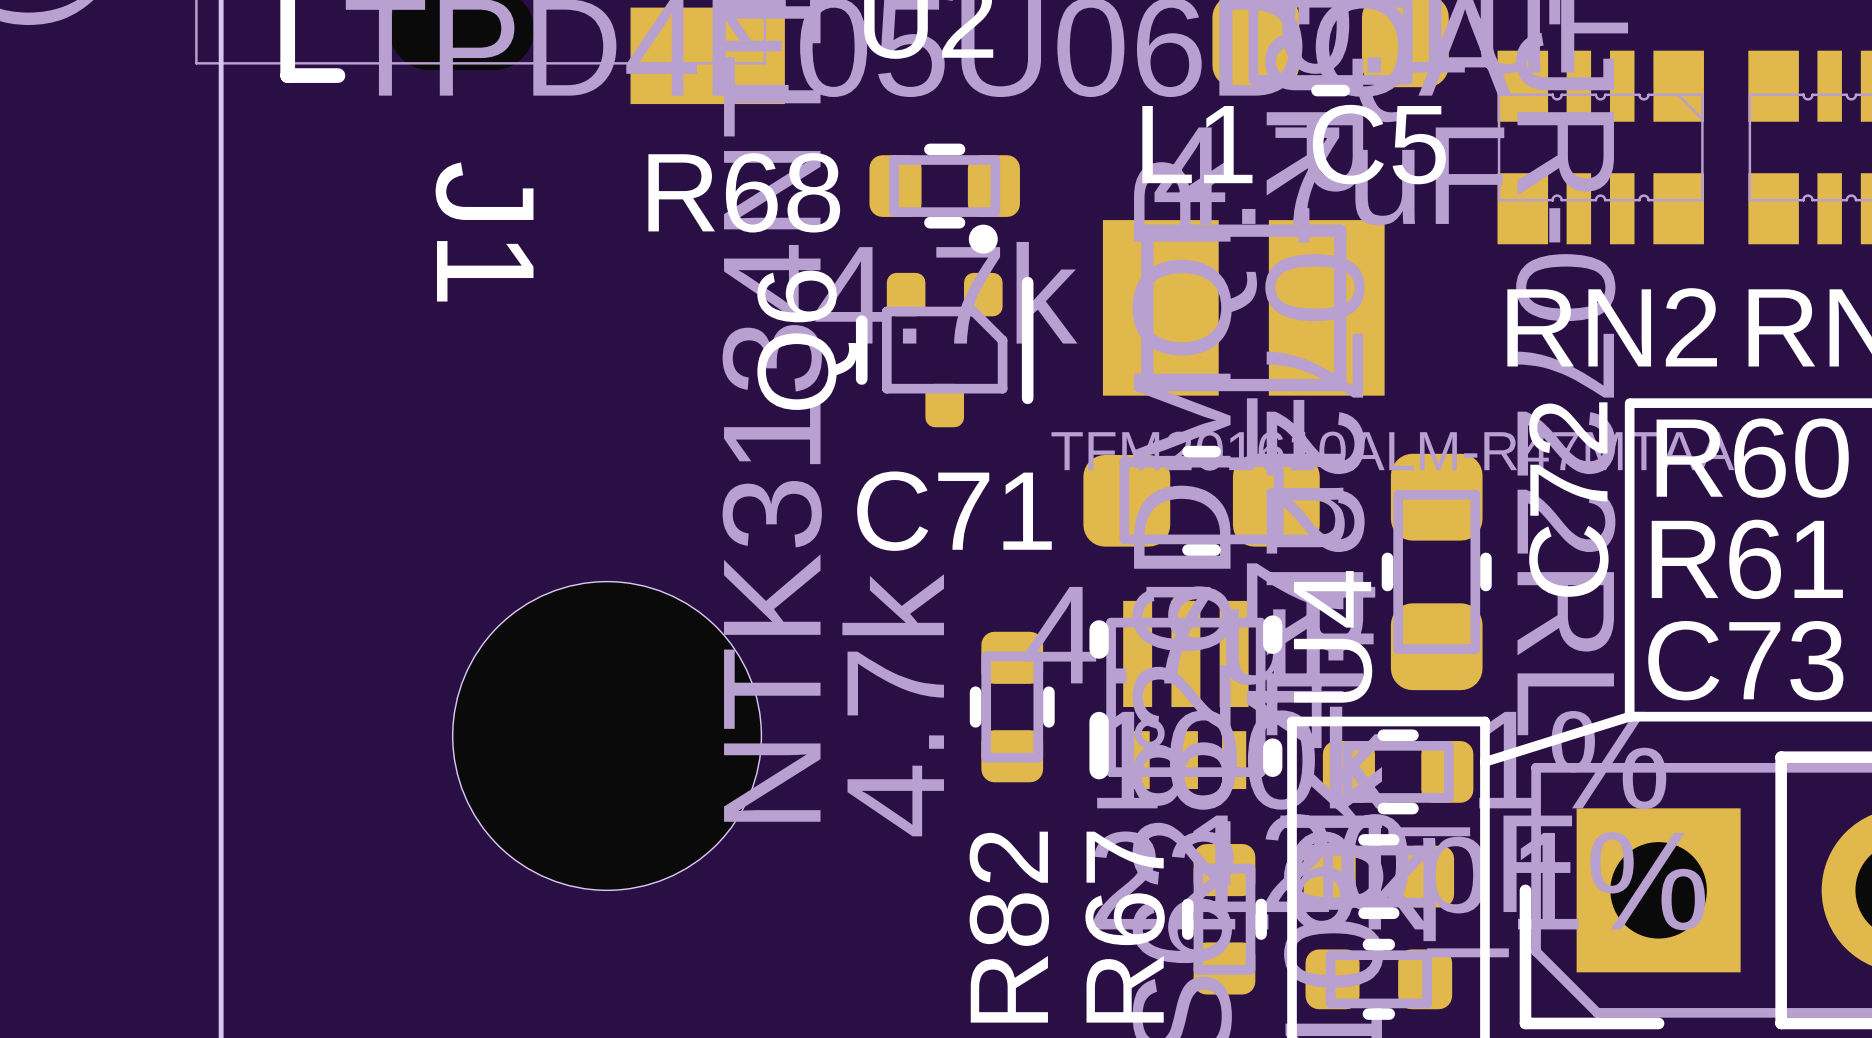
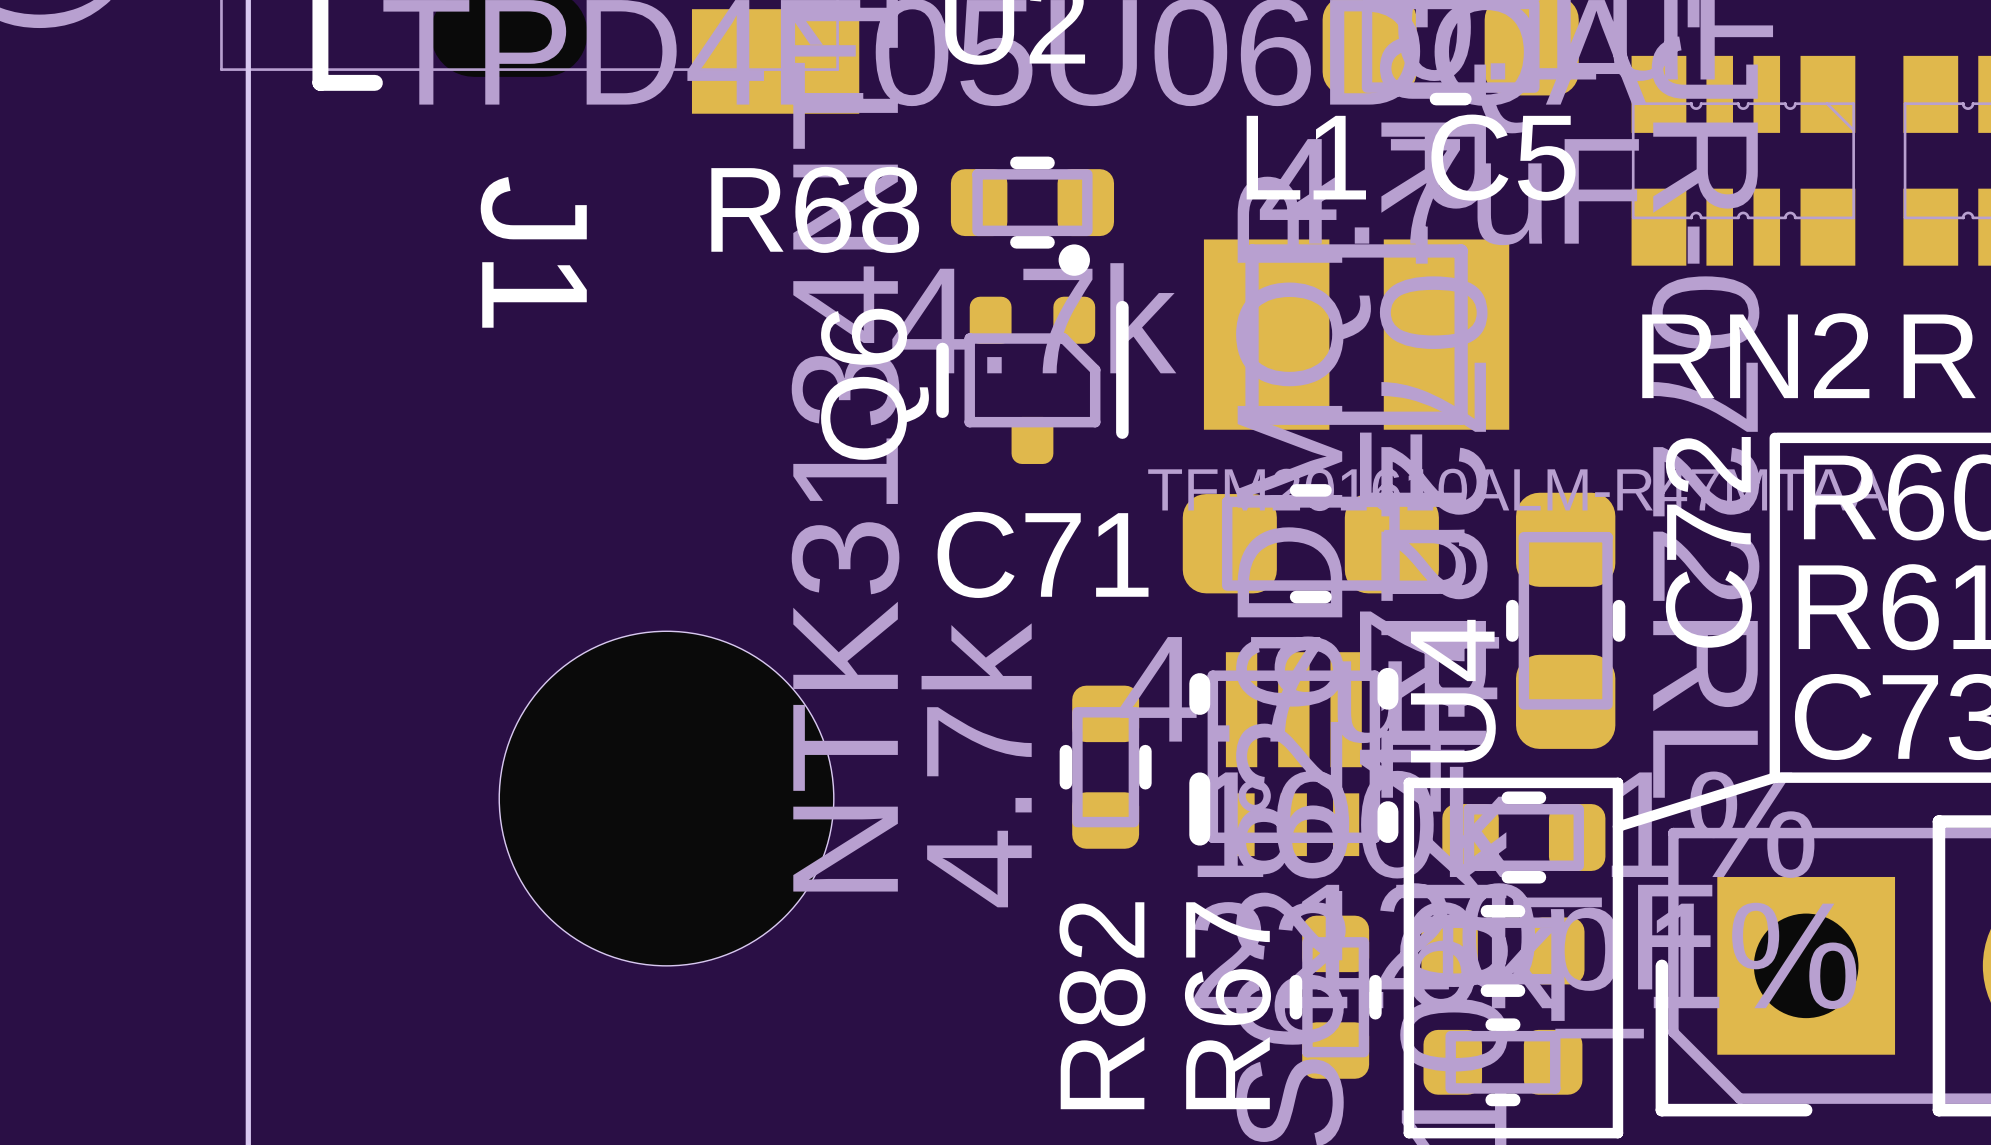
Q6 name position: Q6 (807, 340) -> Q6 (875, 384)

